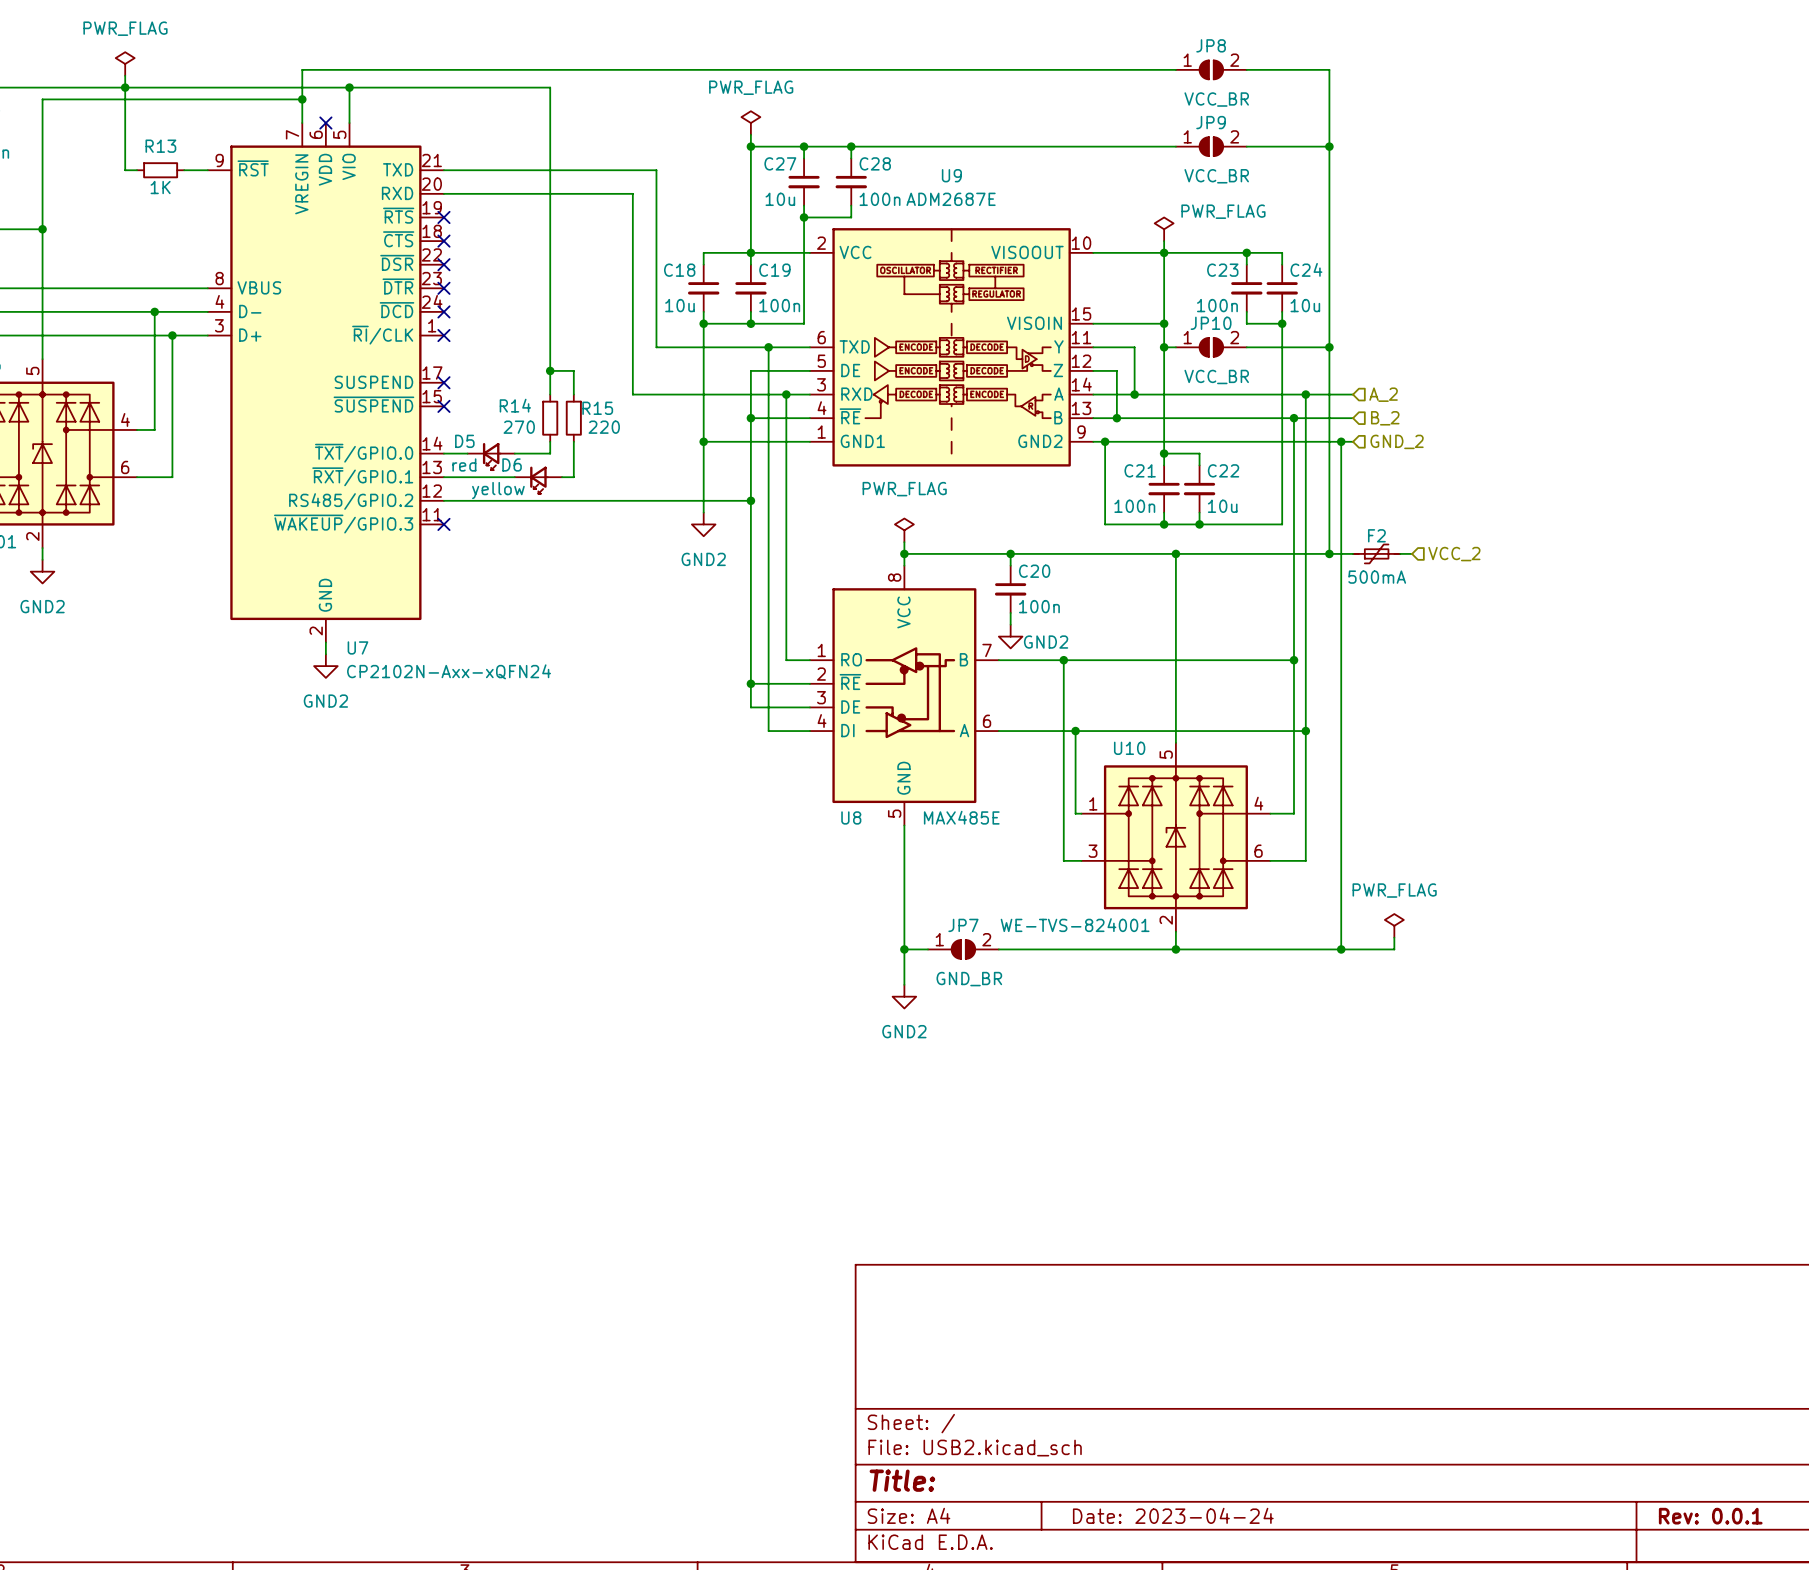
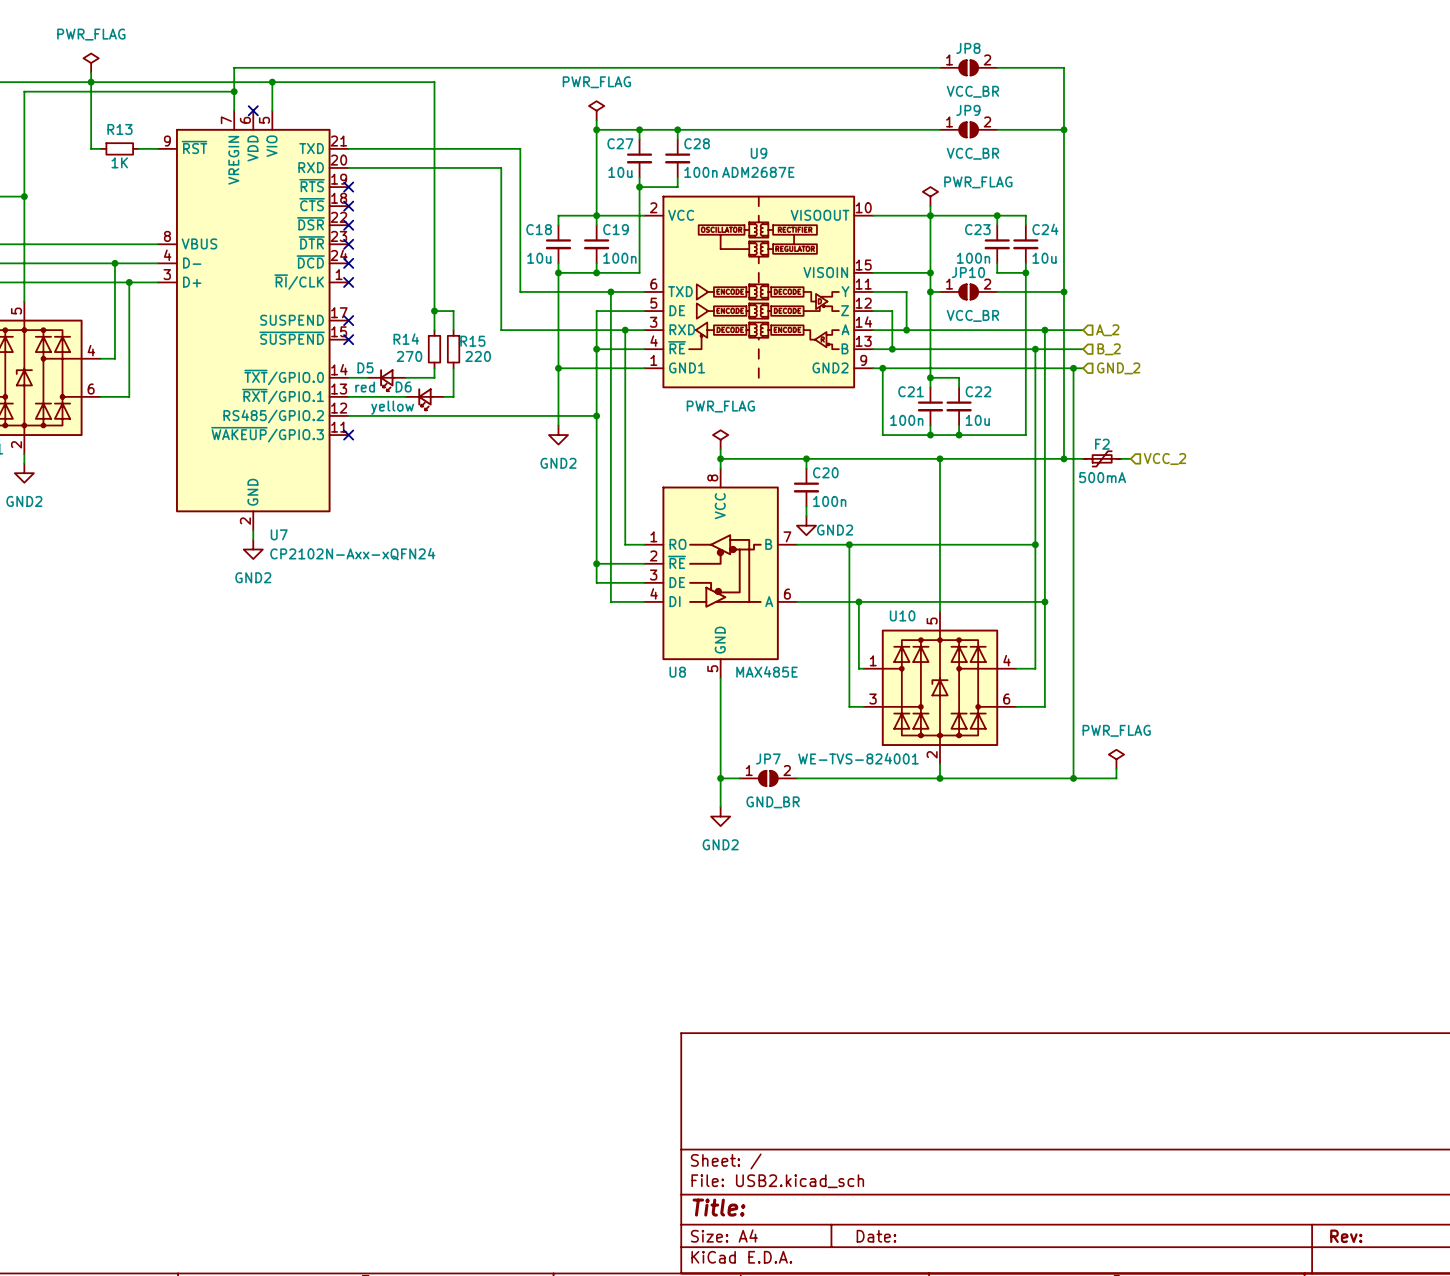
title block: Date: 2023-04-24 (1173, 1515) -> Date: (876, 1236)
title block: Rev: 0.0.1 (1710, 1516) -> Rev: (1346, 1236)

